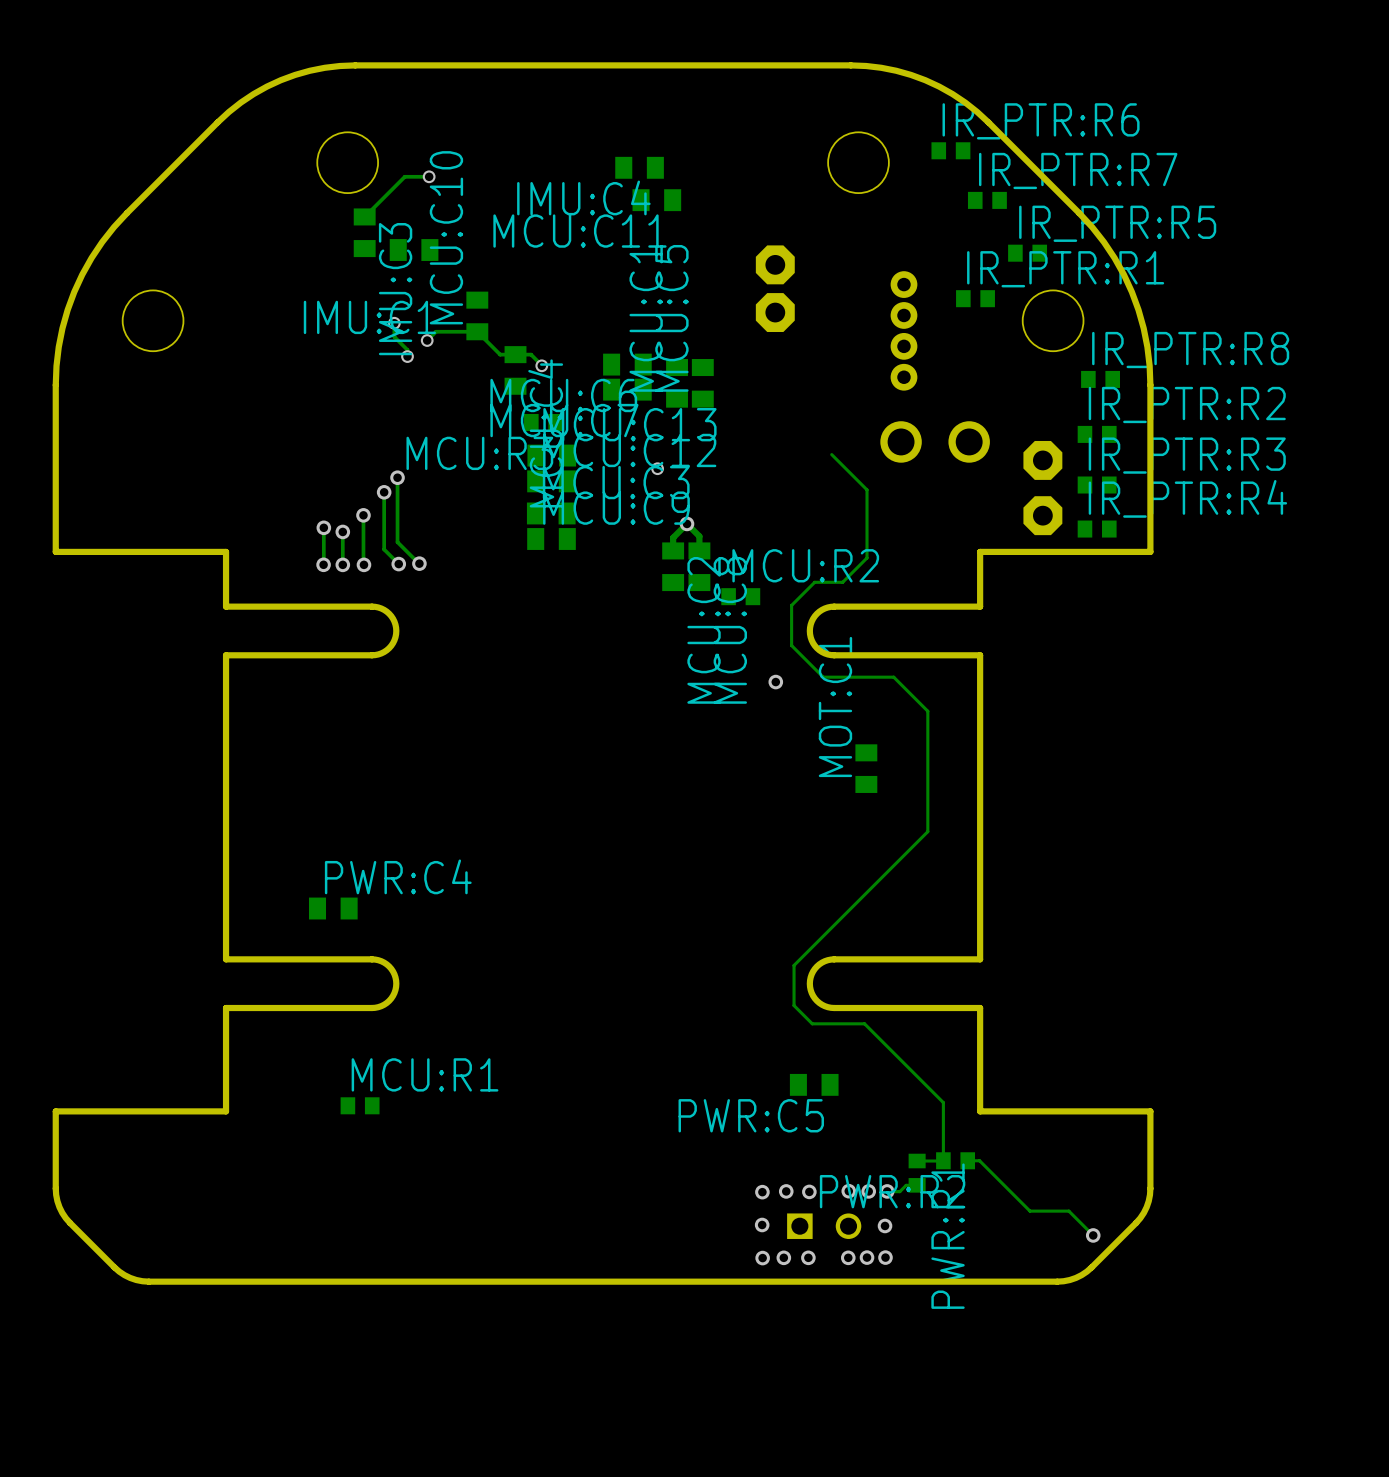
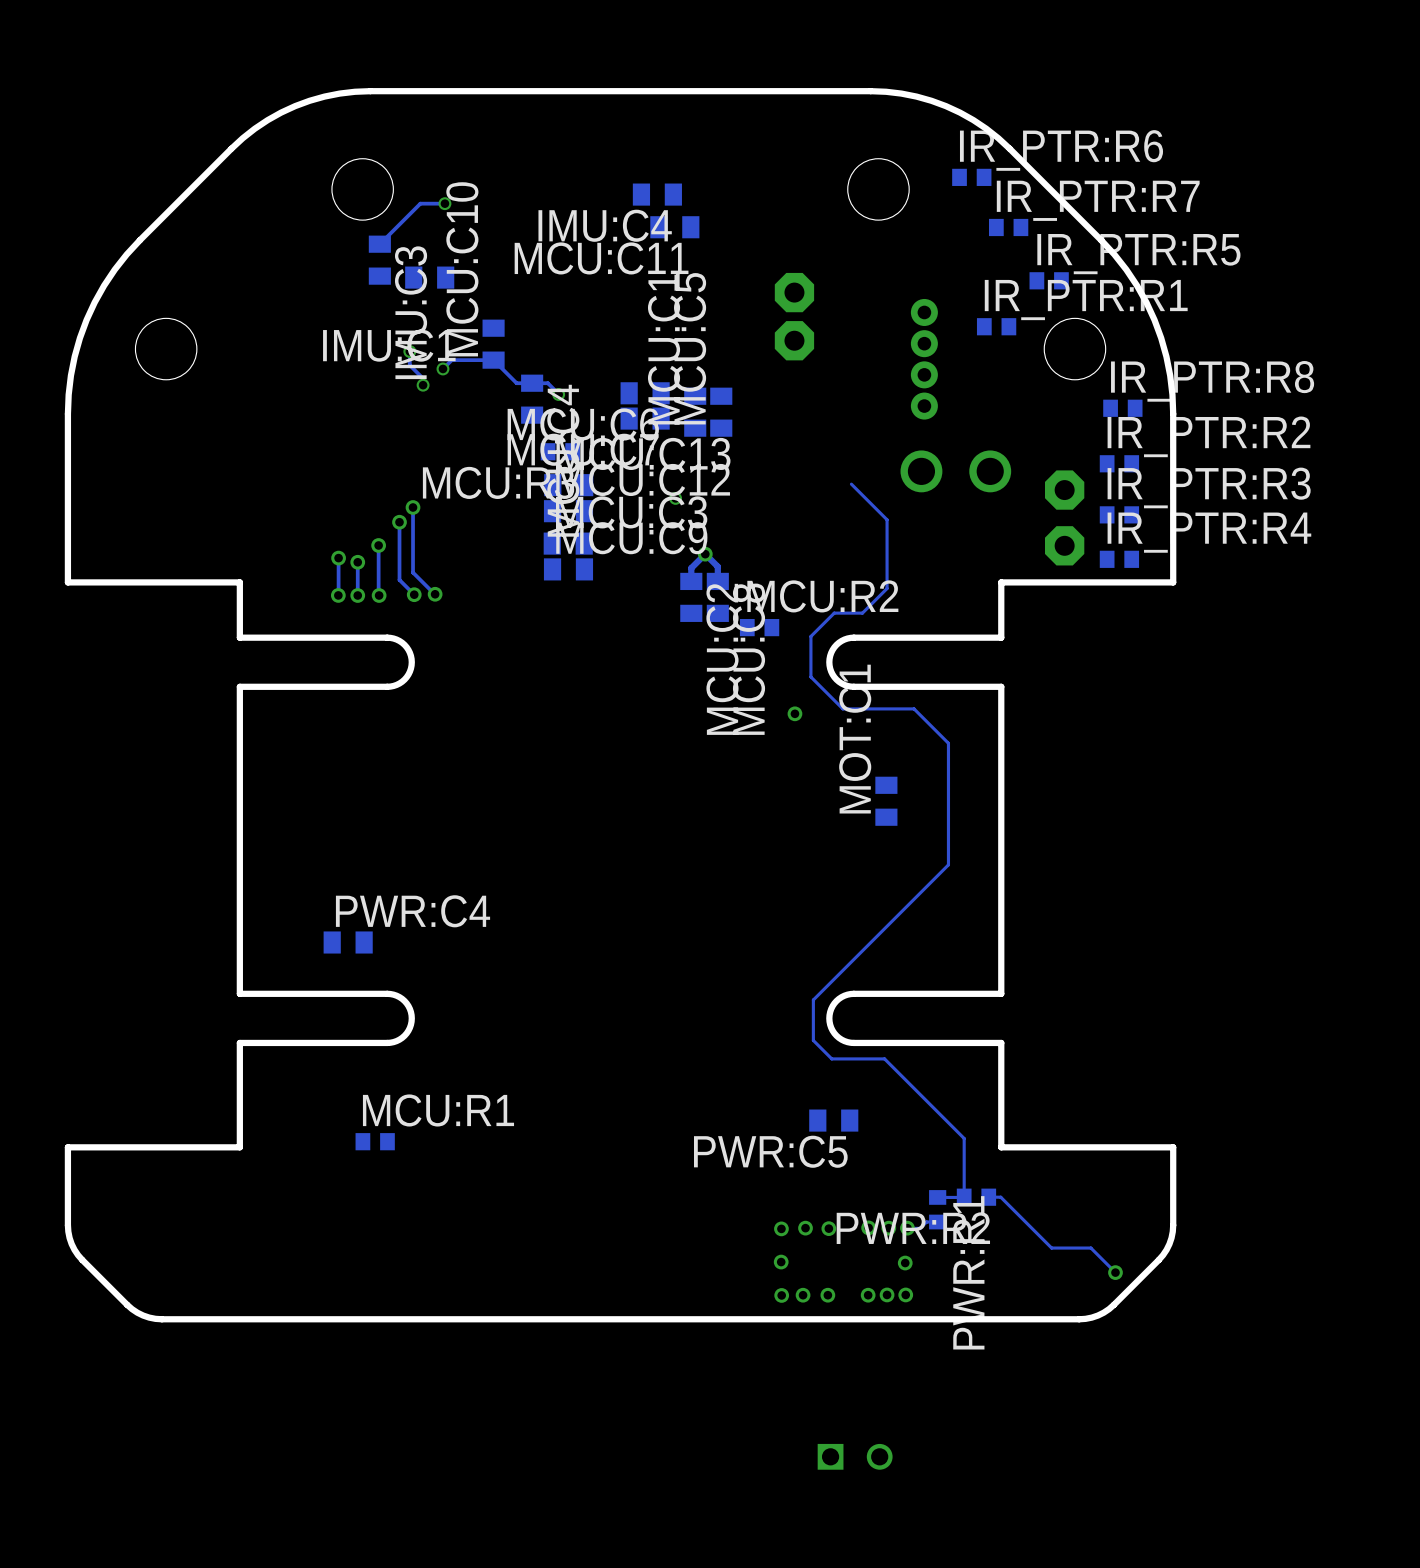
part position: (824, 1226) -> (855, 1456)

